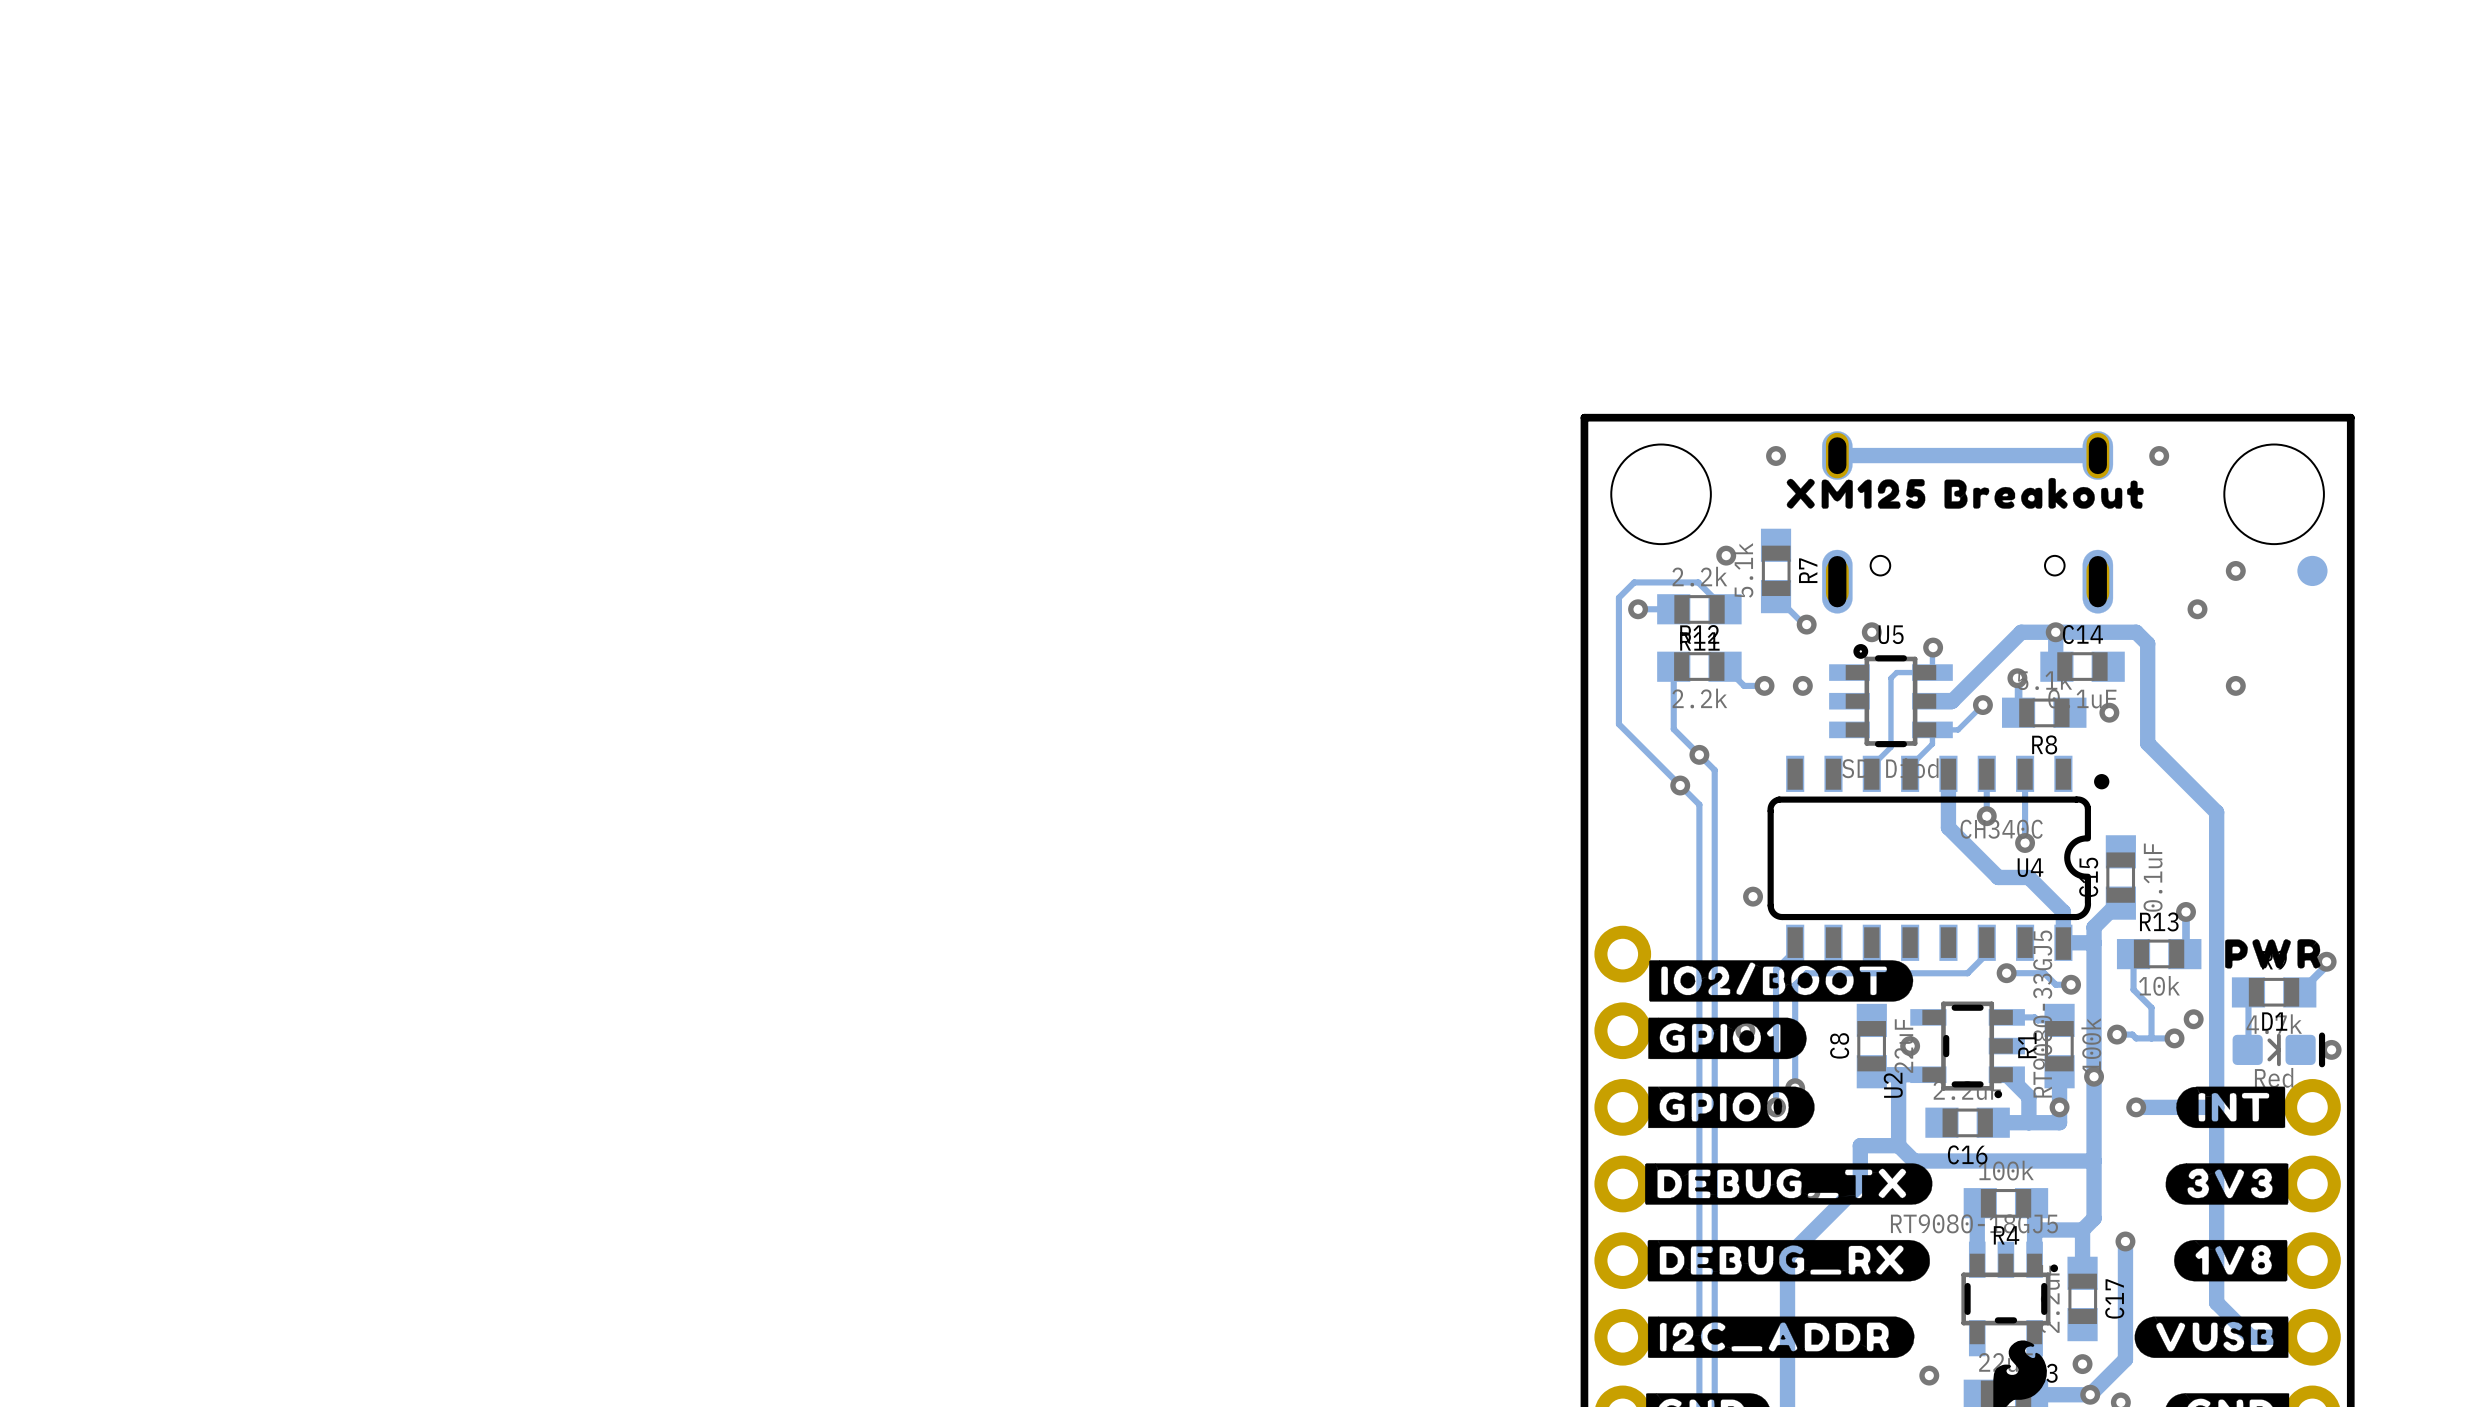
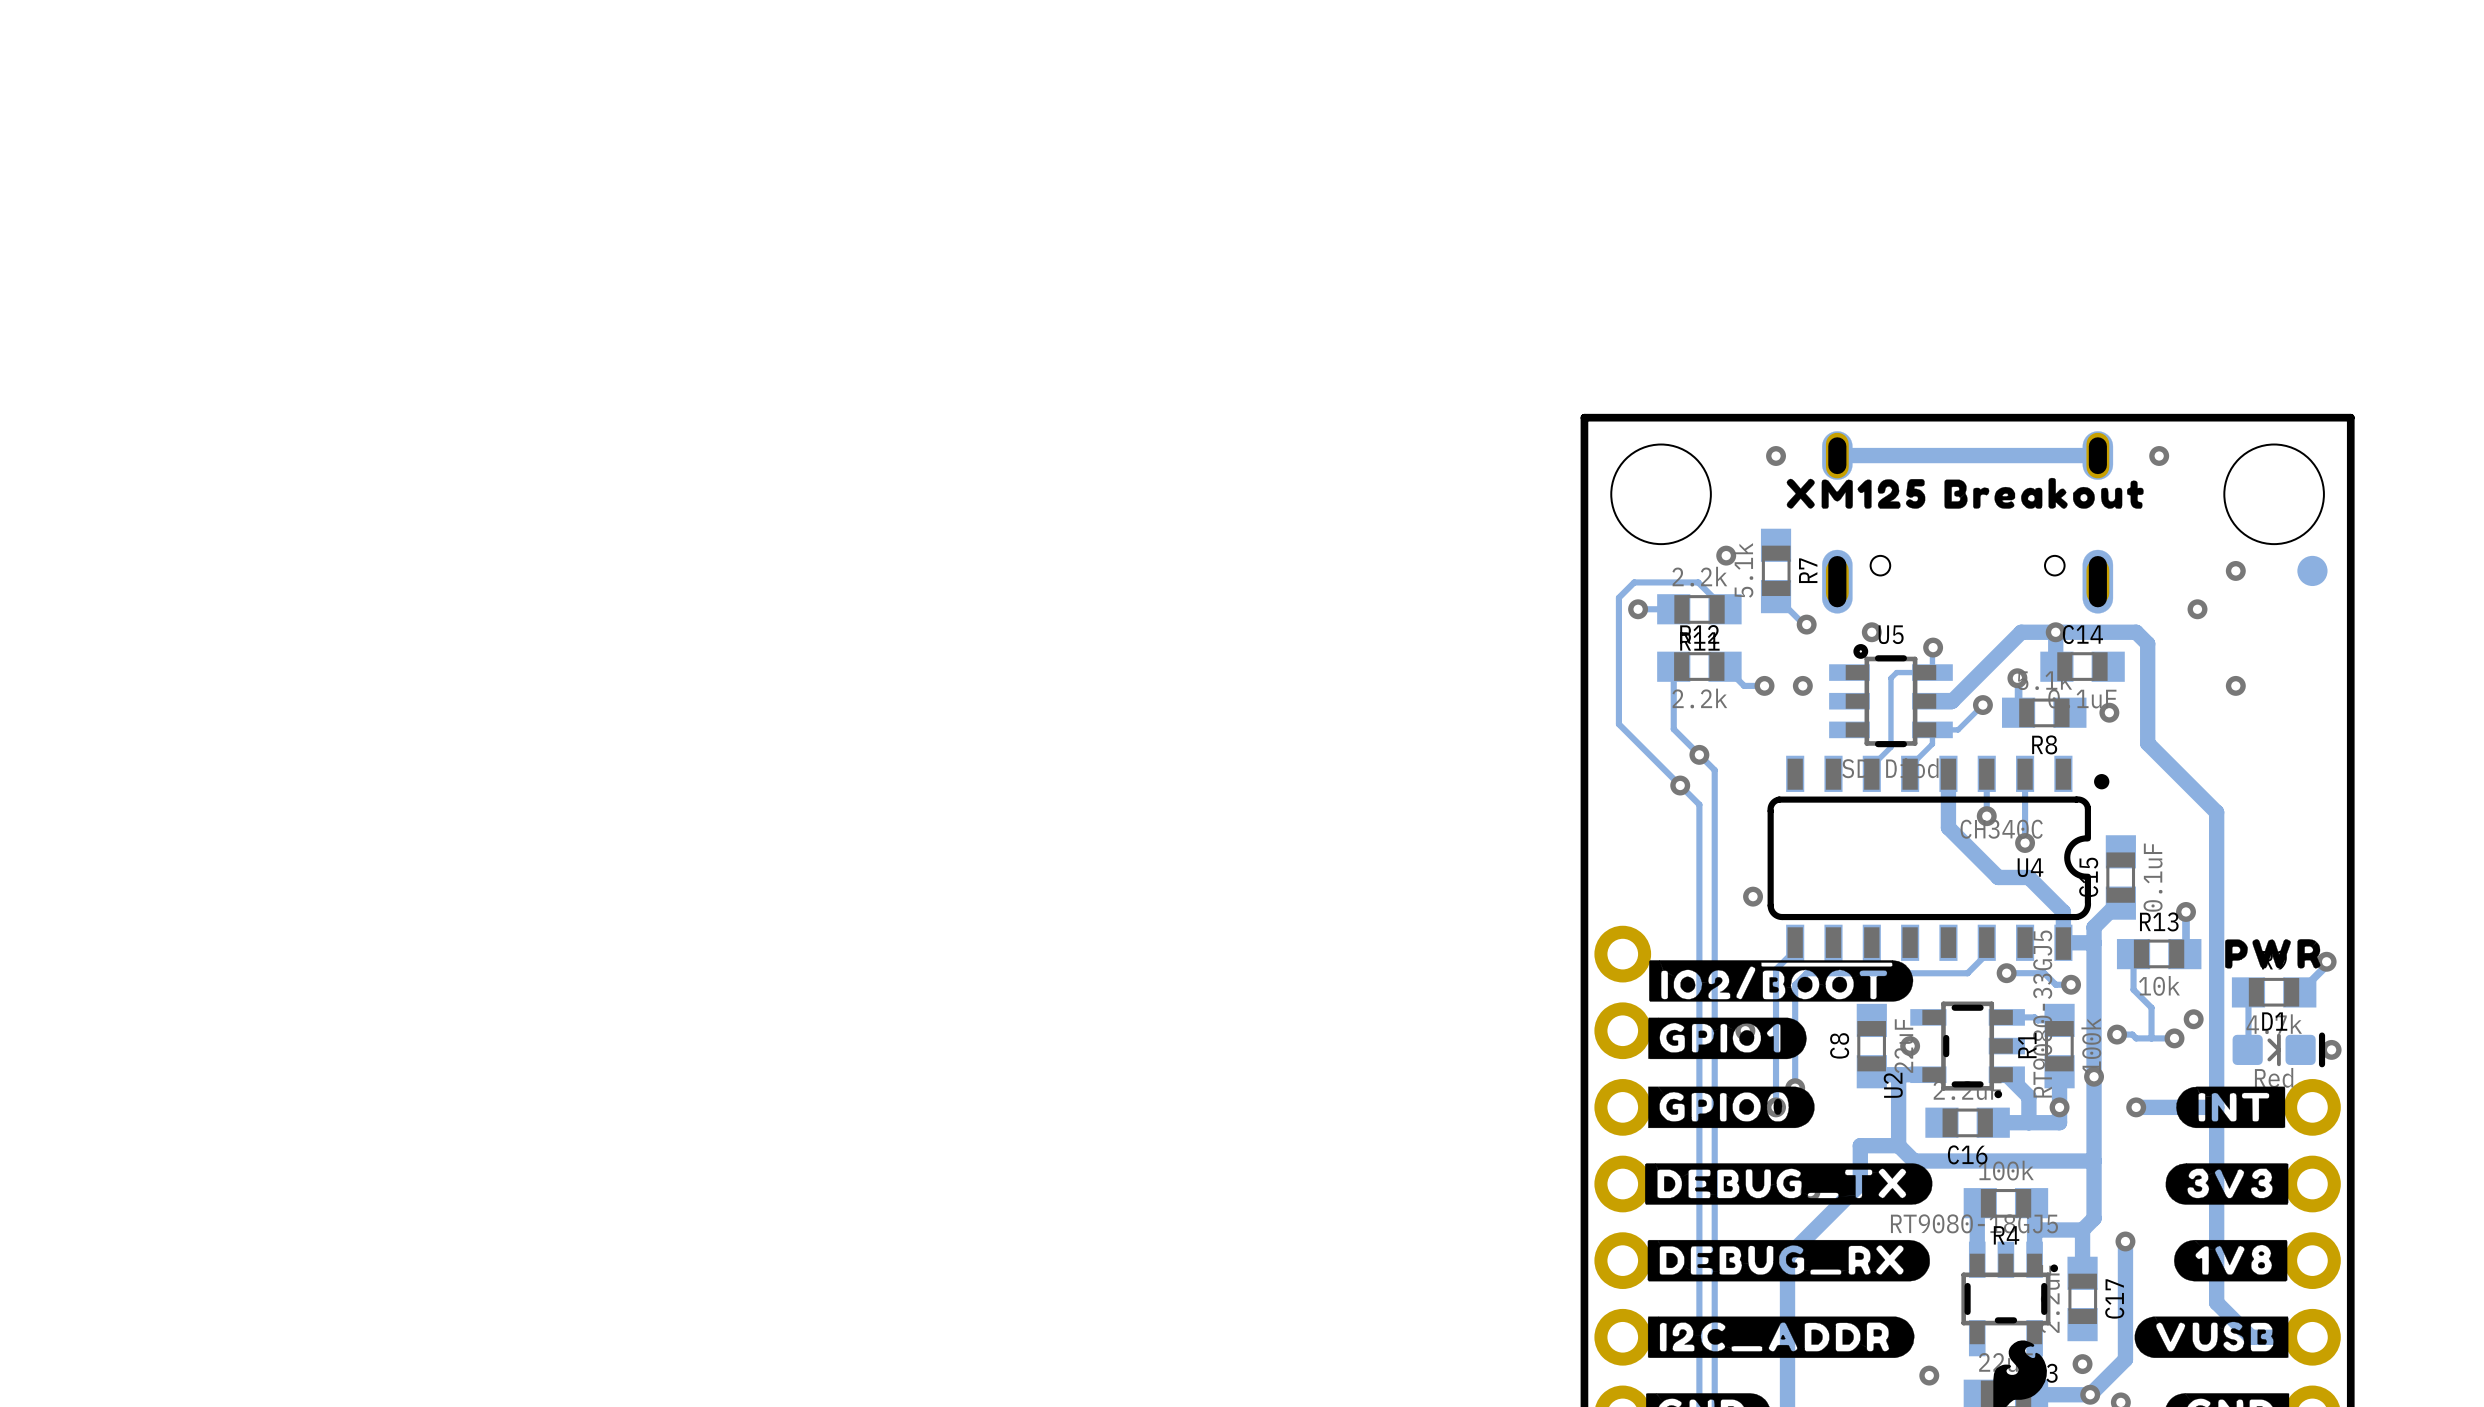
drawing shape: [1649, 960, 1914, 1002] -> [1649, 960, 1914, 1002]

